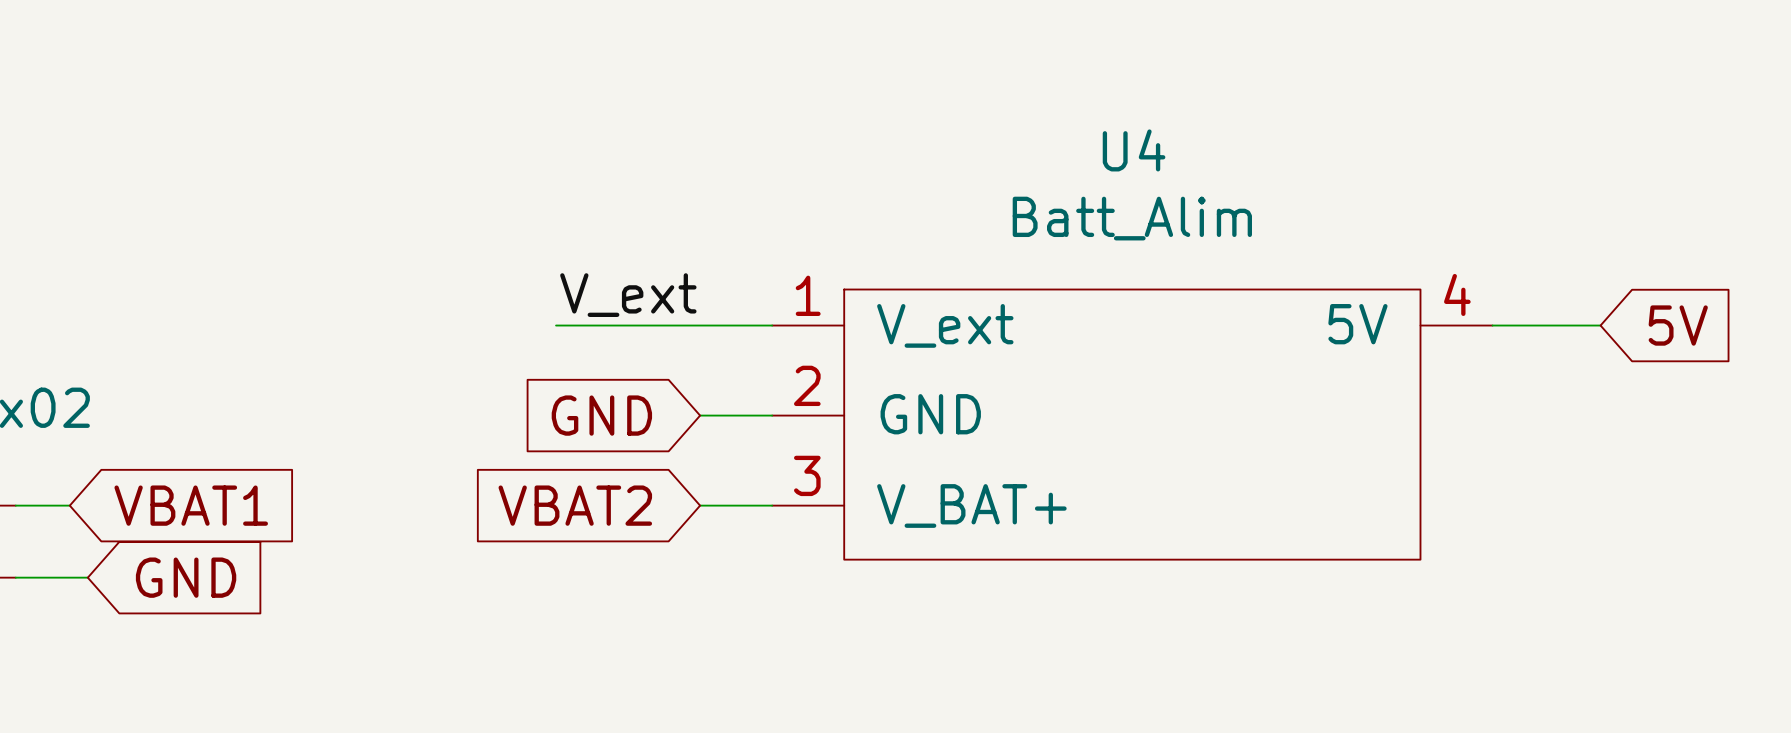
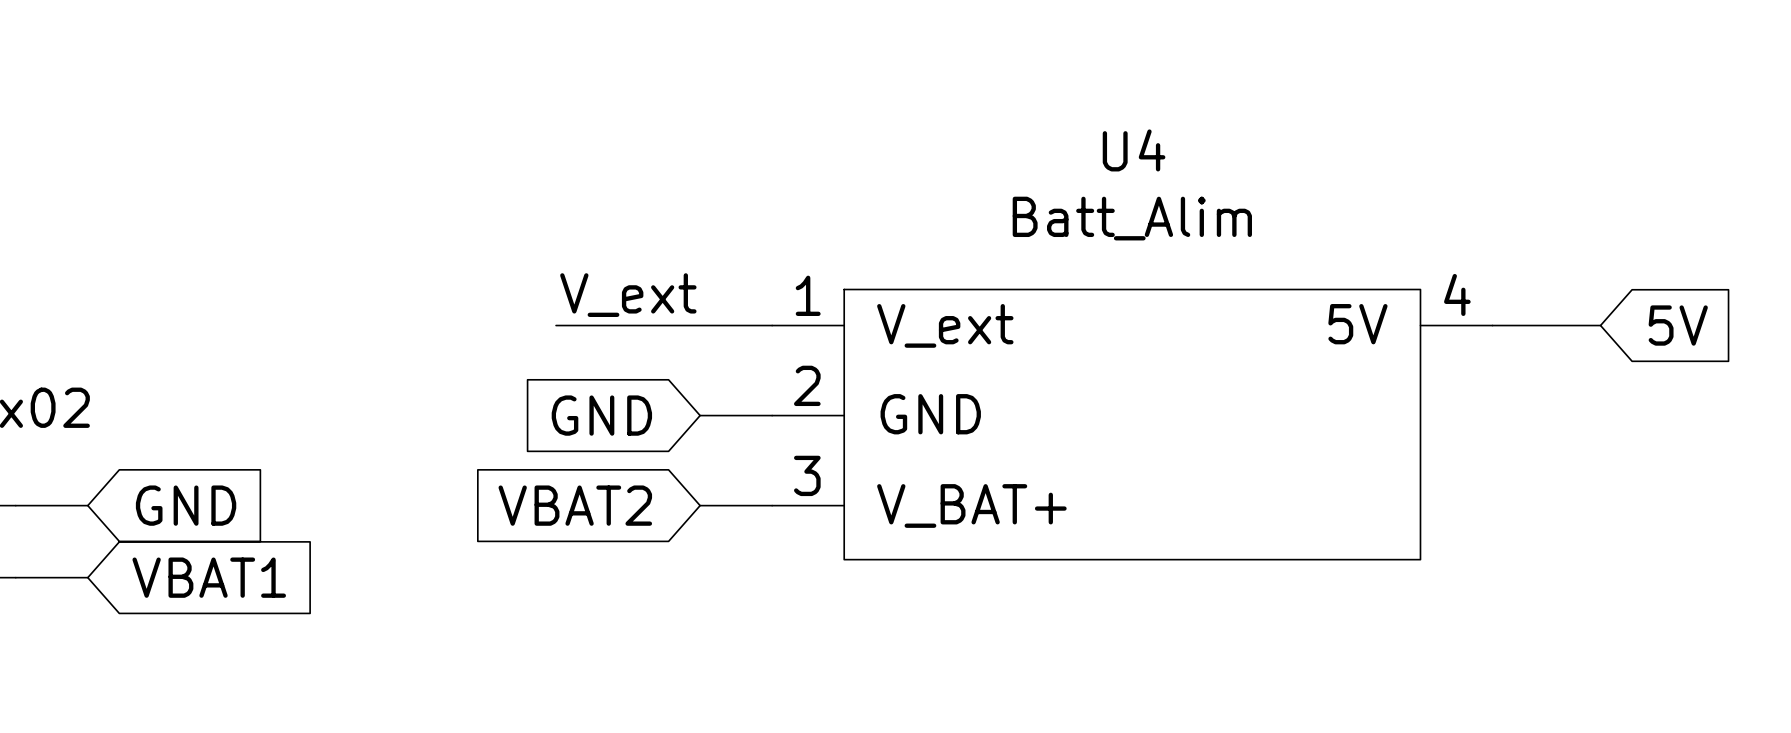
wire: none -> (69, 505) (87, 505)
global label: VBAT1 (191, 505) -> GND (186, 505)
global label: GND (186, 577) -> VBAT1 (209, 577)

